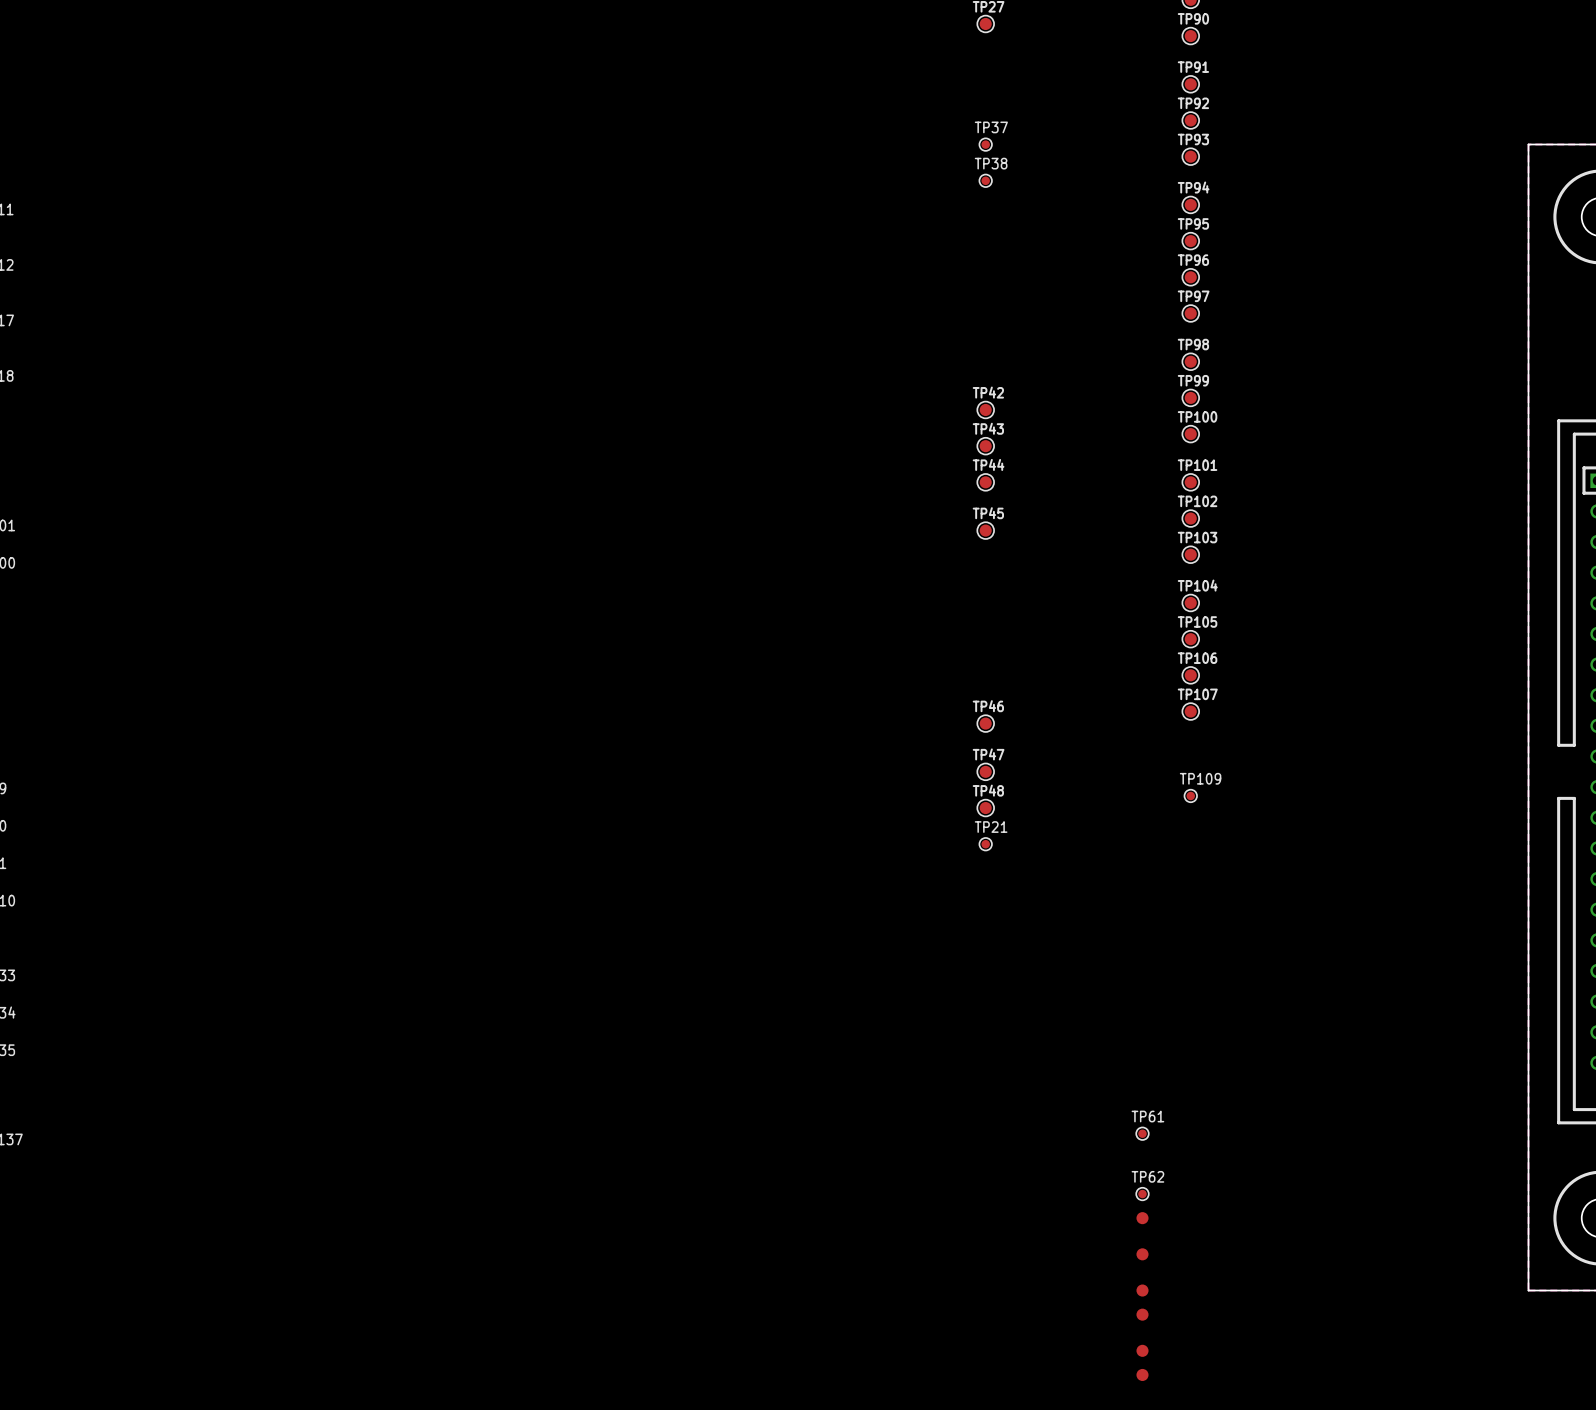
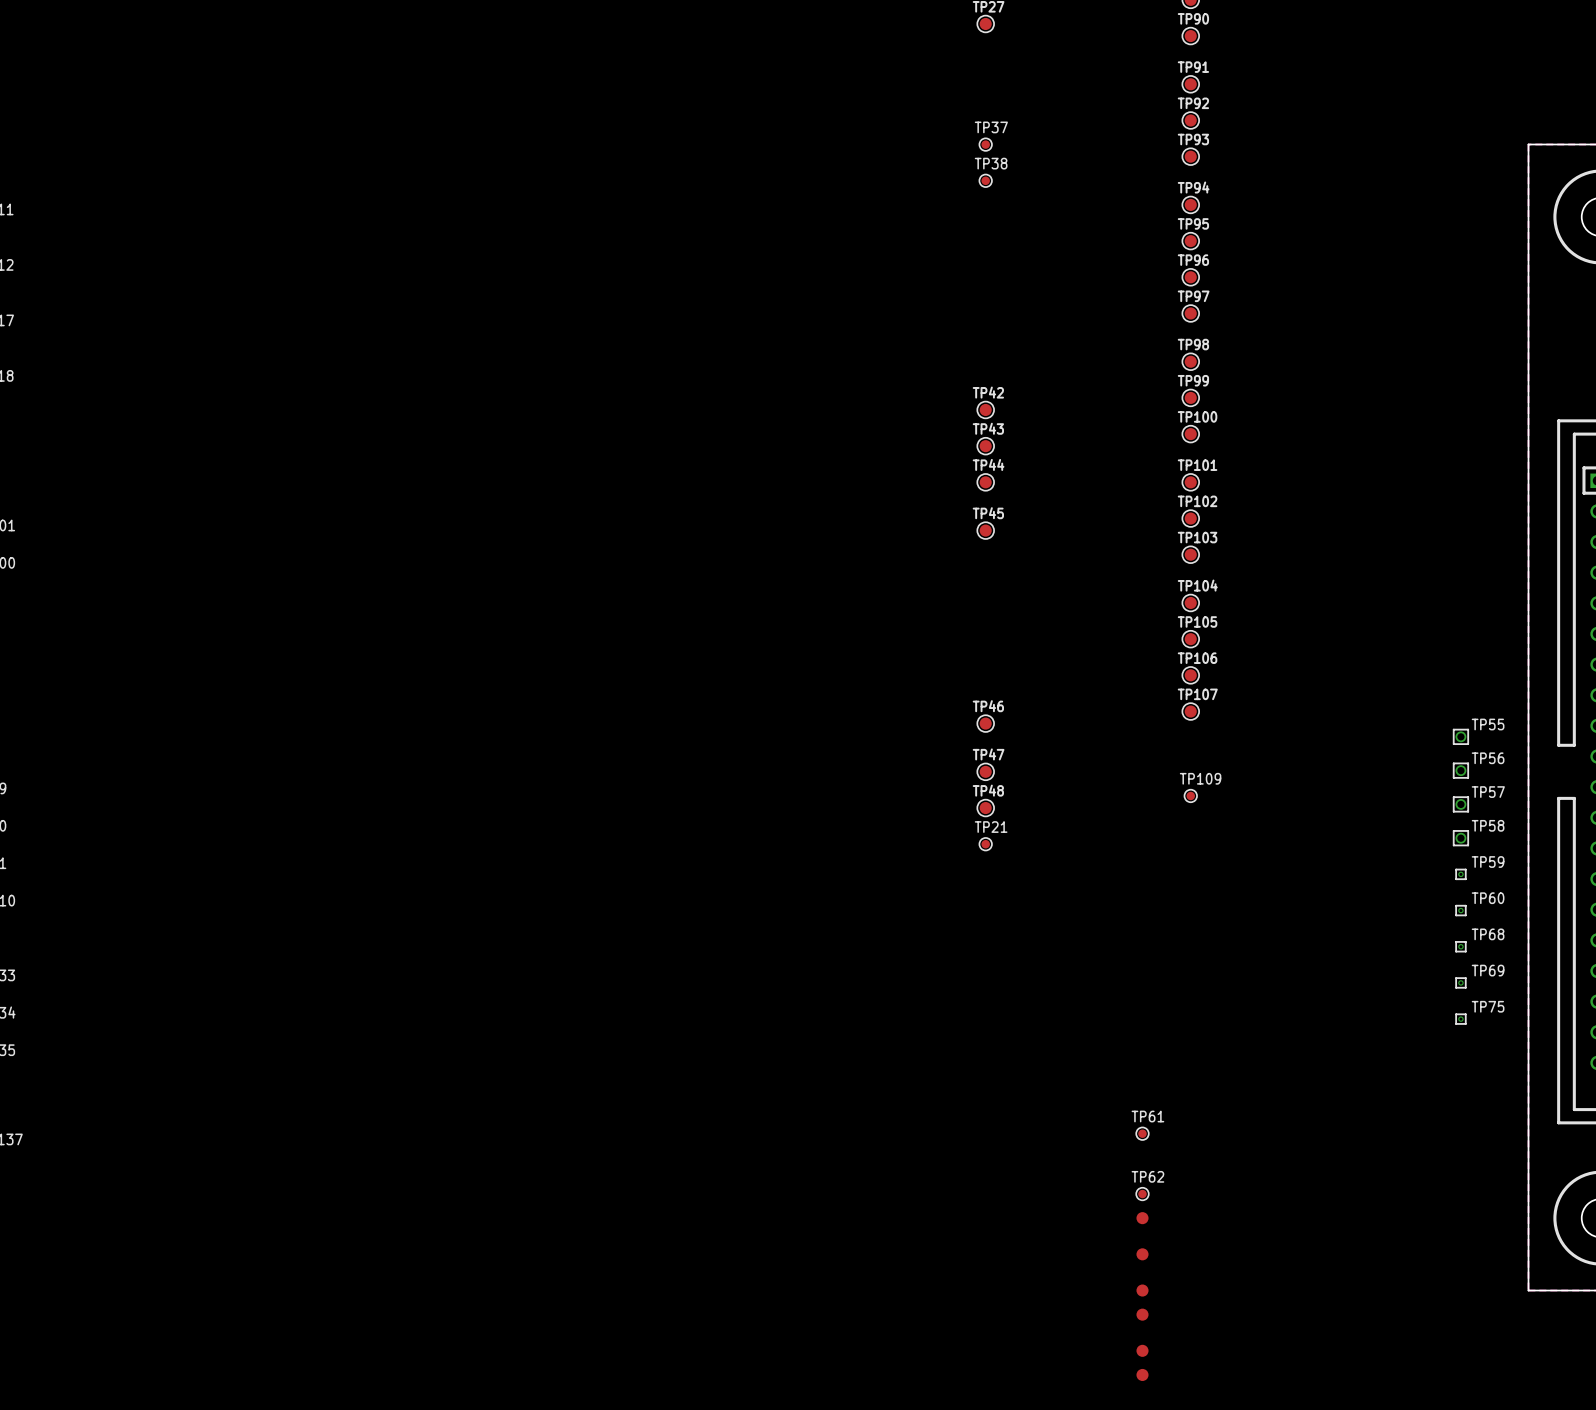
TP55: none -> (1460, 736)
TP56: none -> (1460, 770)
TP57: none -> (1460, 804)
TP58: none -> (1460, 838)
TP59: none -> (1460, 874)
TP60: none -> (1460, 910)
TP68: none -> (1460, 946)
TP69: none -> (1460, 982)
TP75: none -> (1460, 1019)

